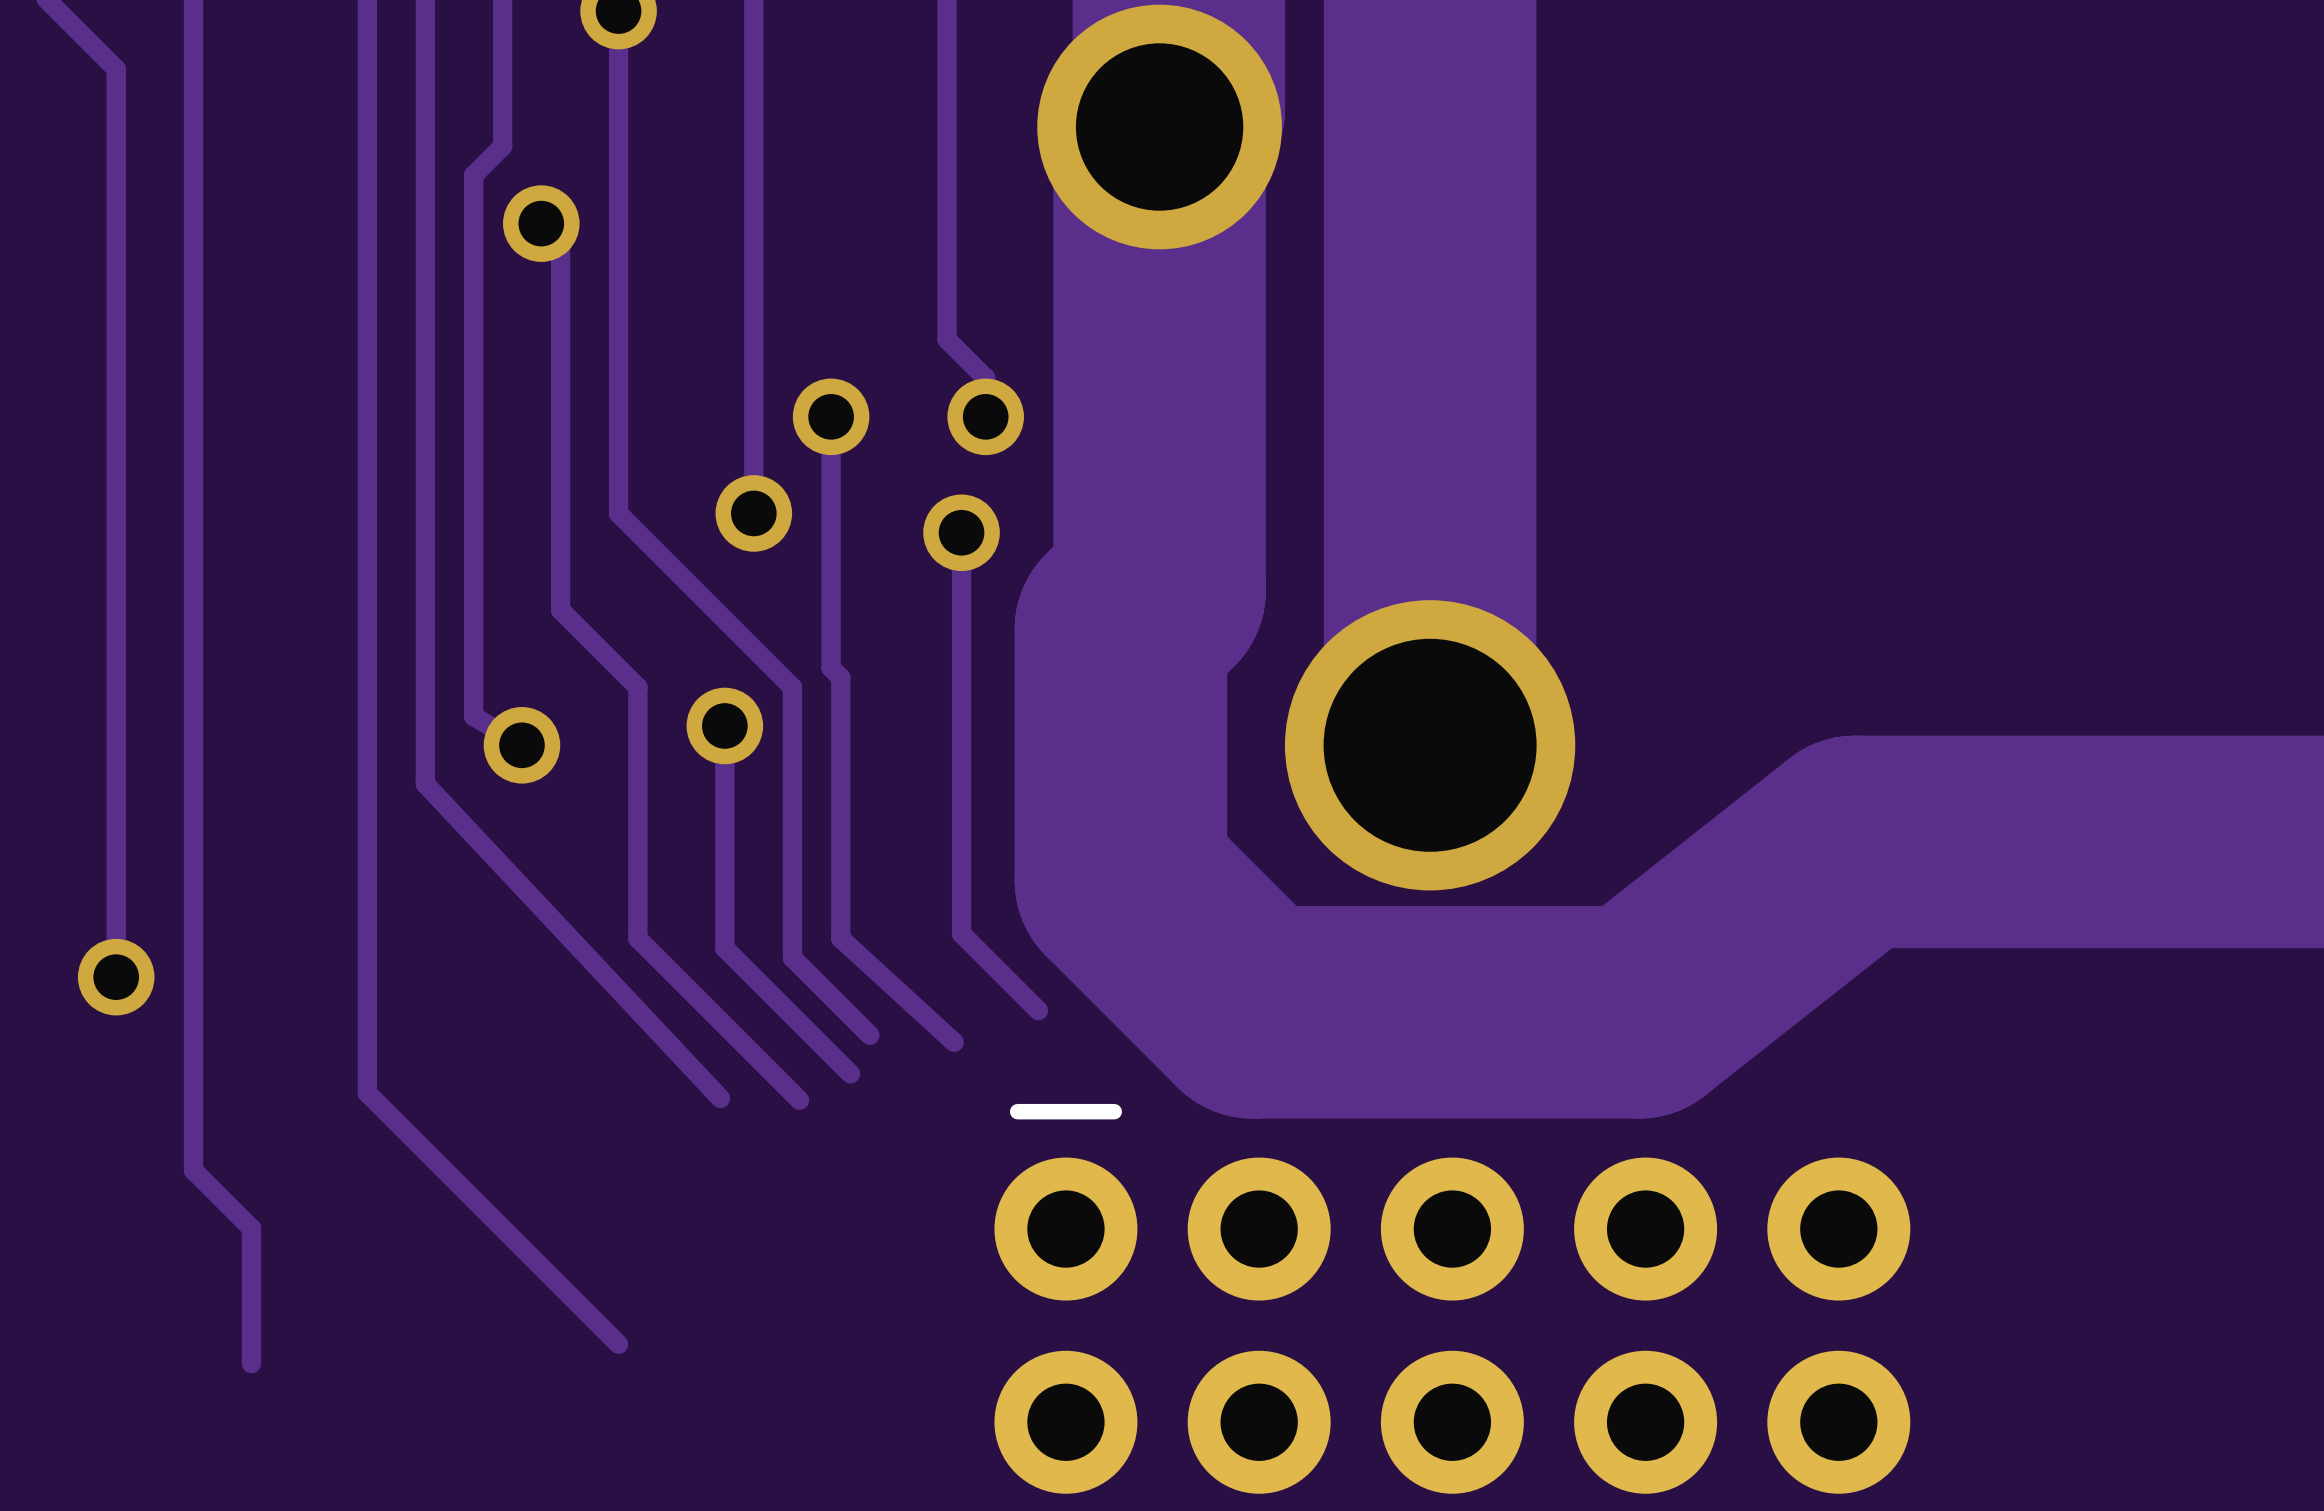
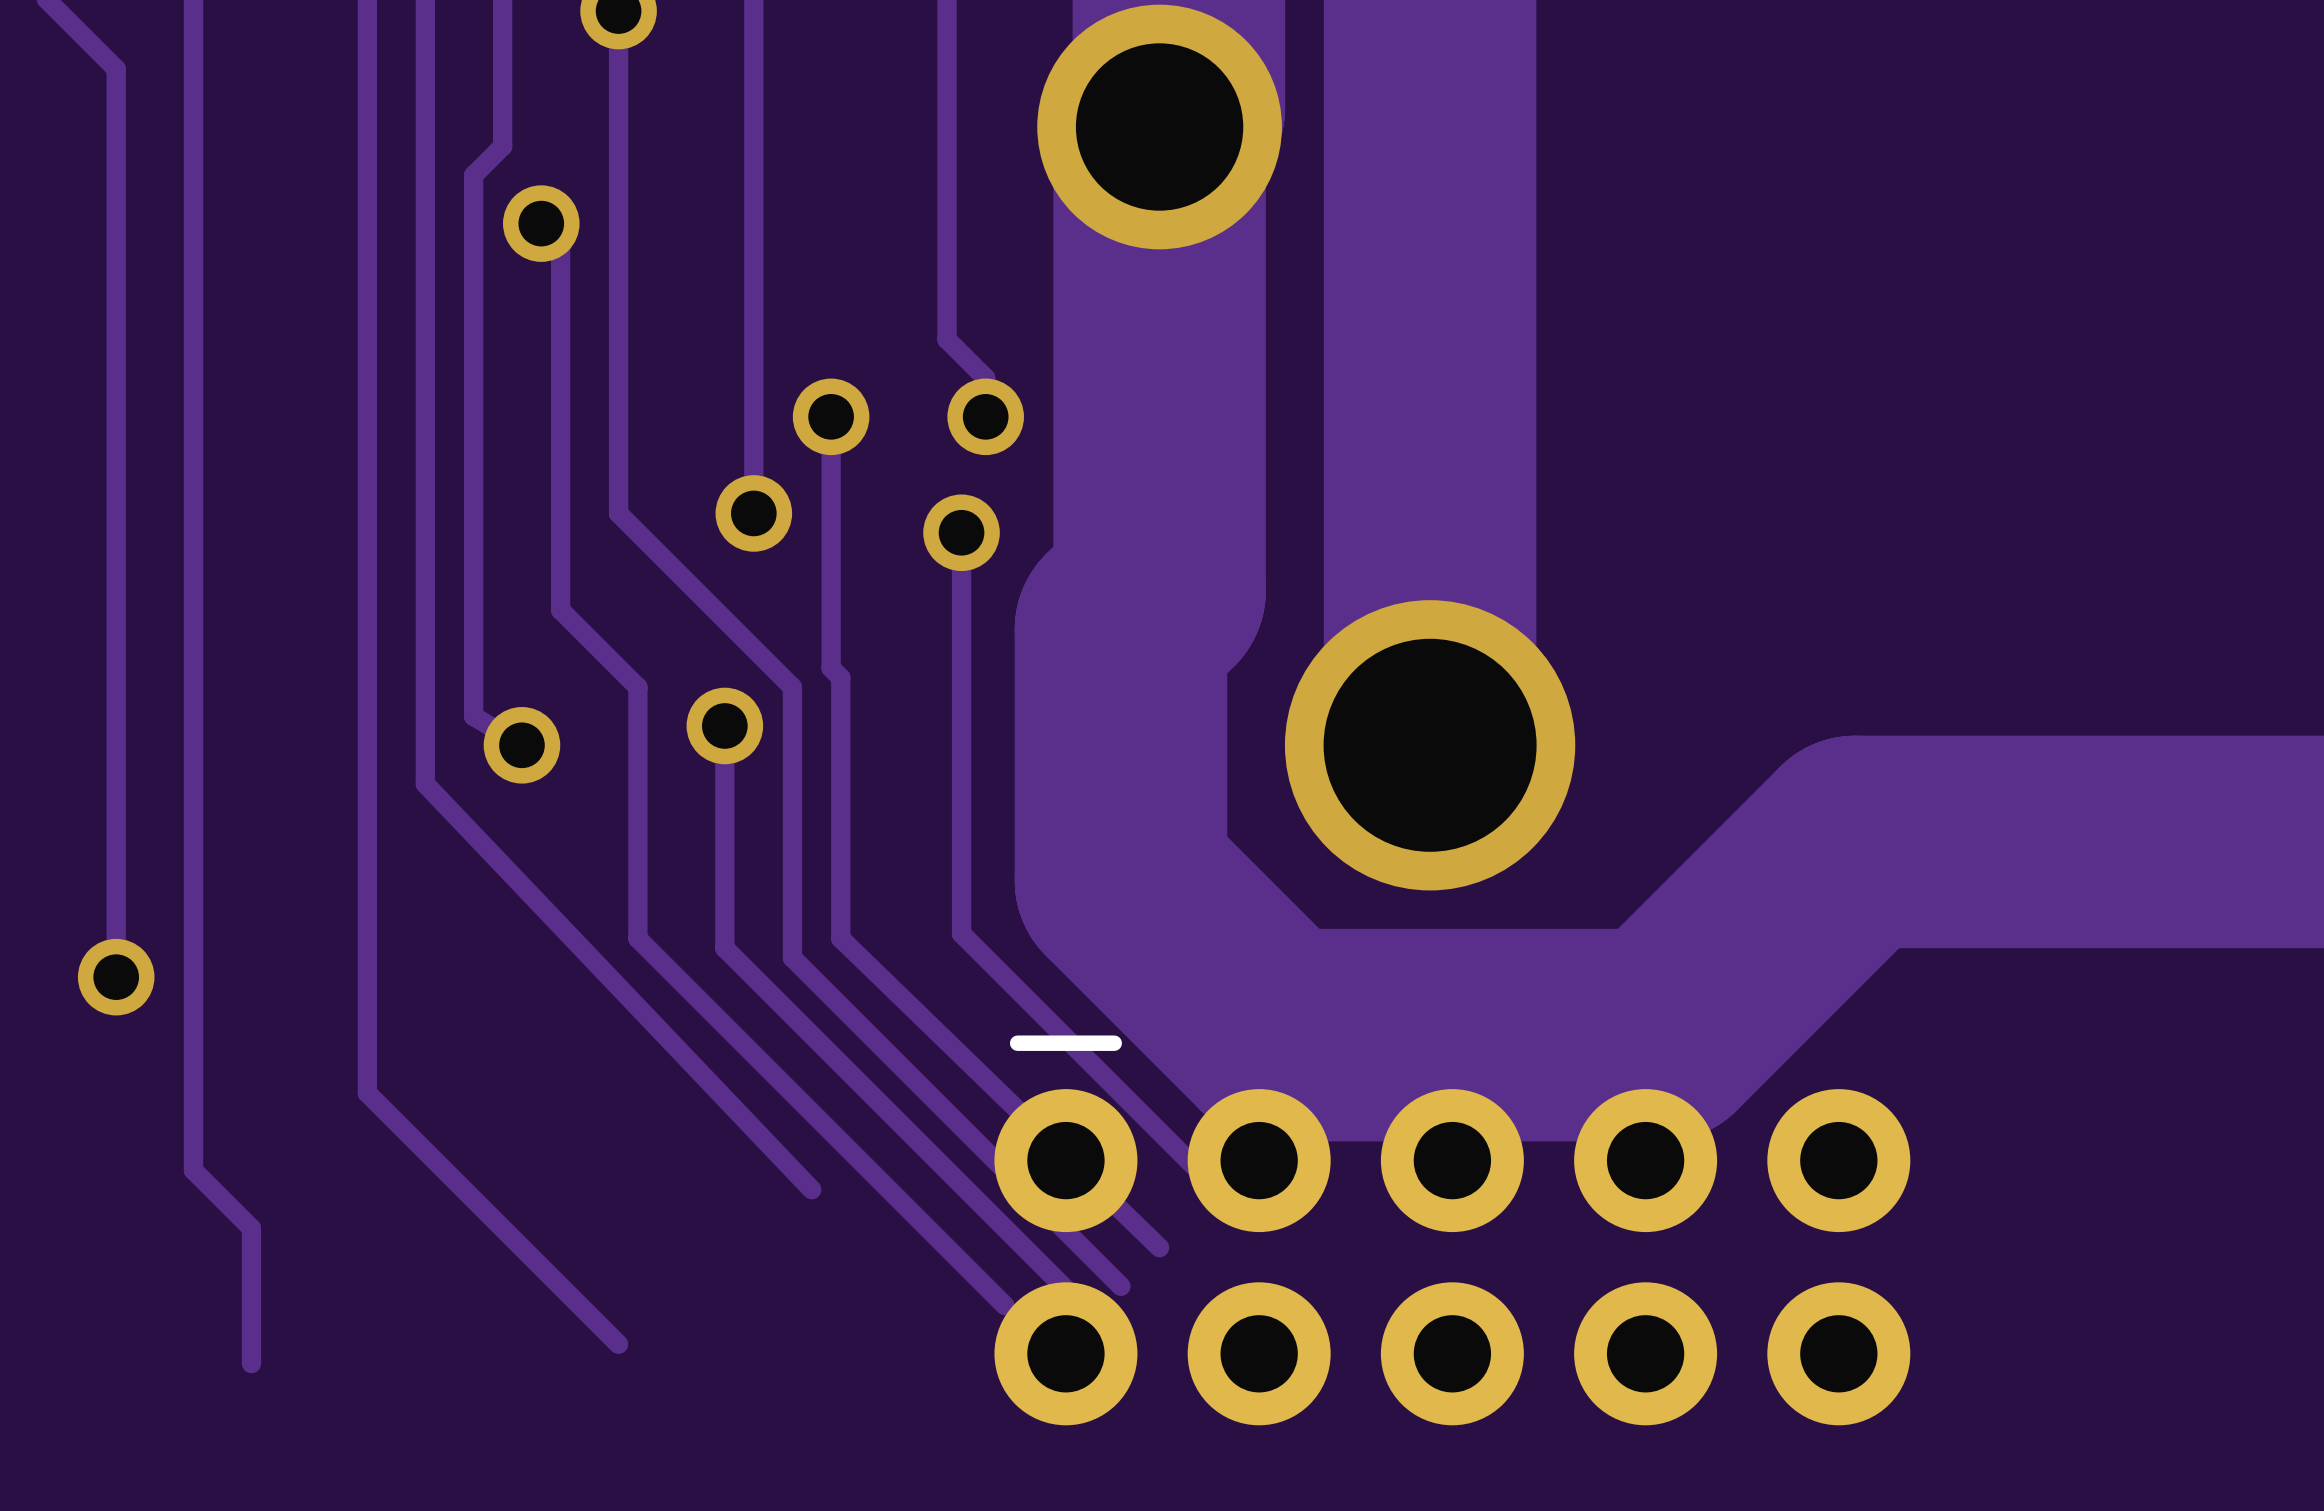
track: (425, 783) (720, 1098) -> (425, 783) (811, 1189)
track: (1855, 841) (1639, 1012) (1252, 1012) -> (1855, 841) (1661, 1035) (1275, 1035) (1252, 1012)
track: (840, 938) (954, 1042) -> (840, 938) (1159, 1247)
track: none -> (1038, 1010) (1198, 1170)
track: none -> (869, 1035) (1120, 1286)
track: none -> (850, 1073) (1101, 1324)
track: none -> (799, 1100) (1005, 1305)
part position: (1452, 1298) -> (1452, 1230)

